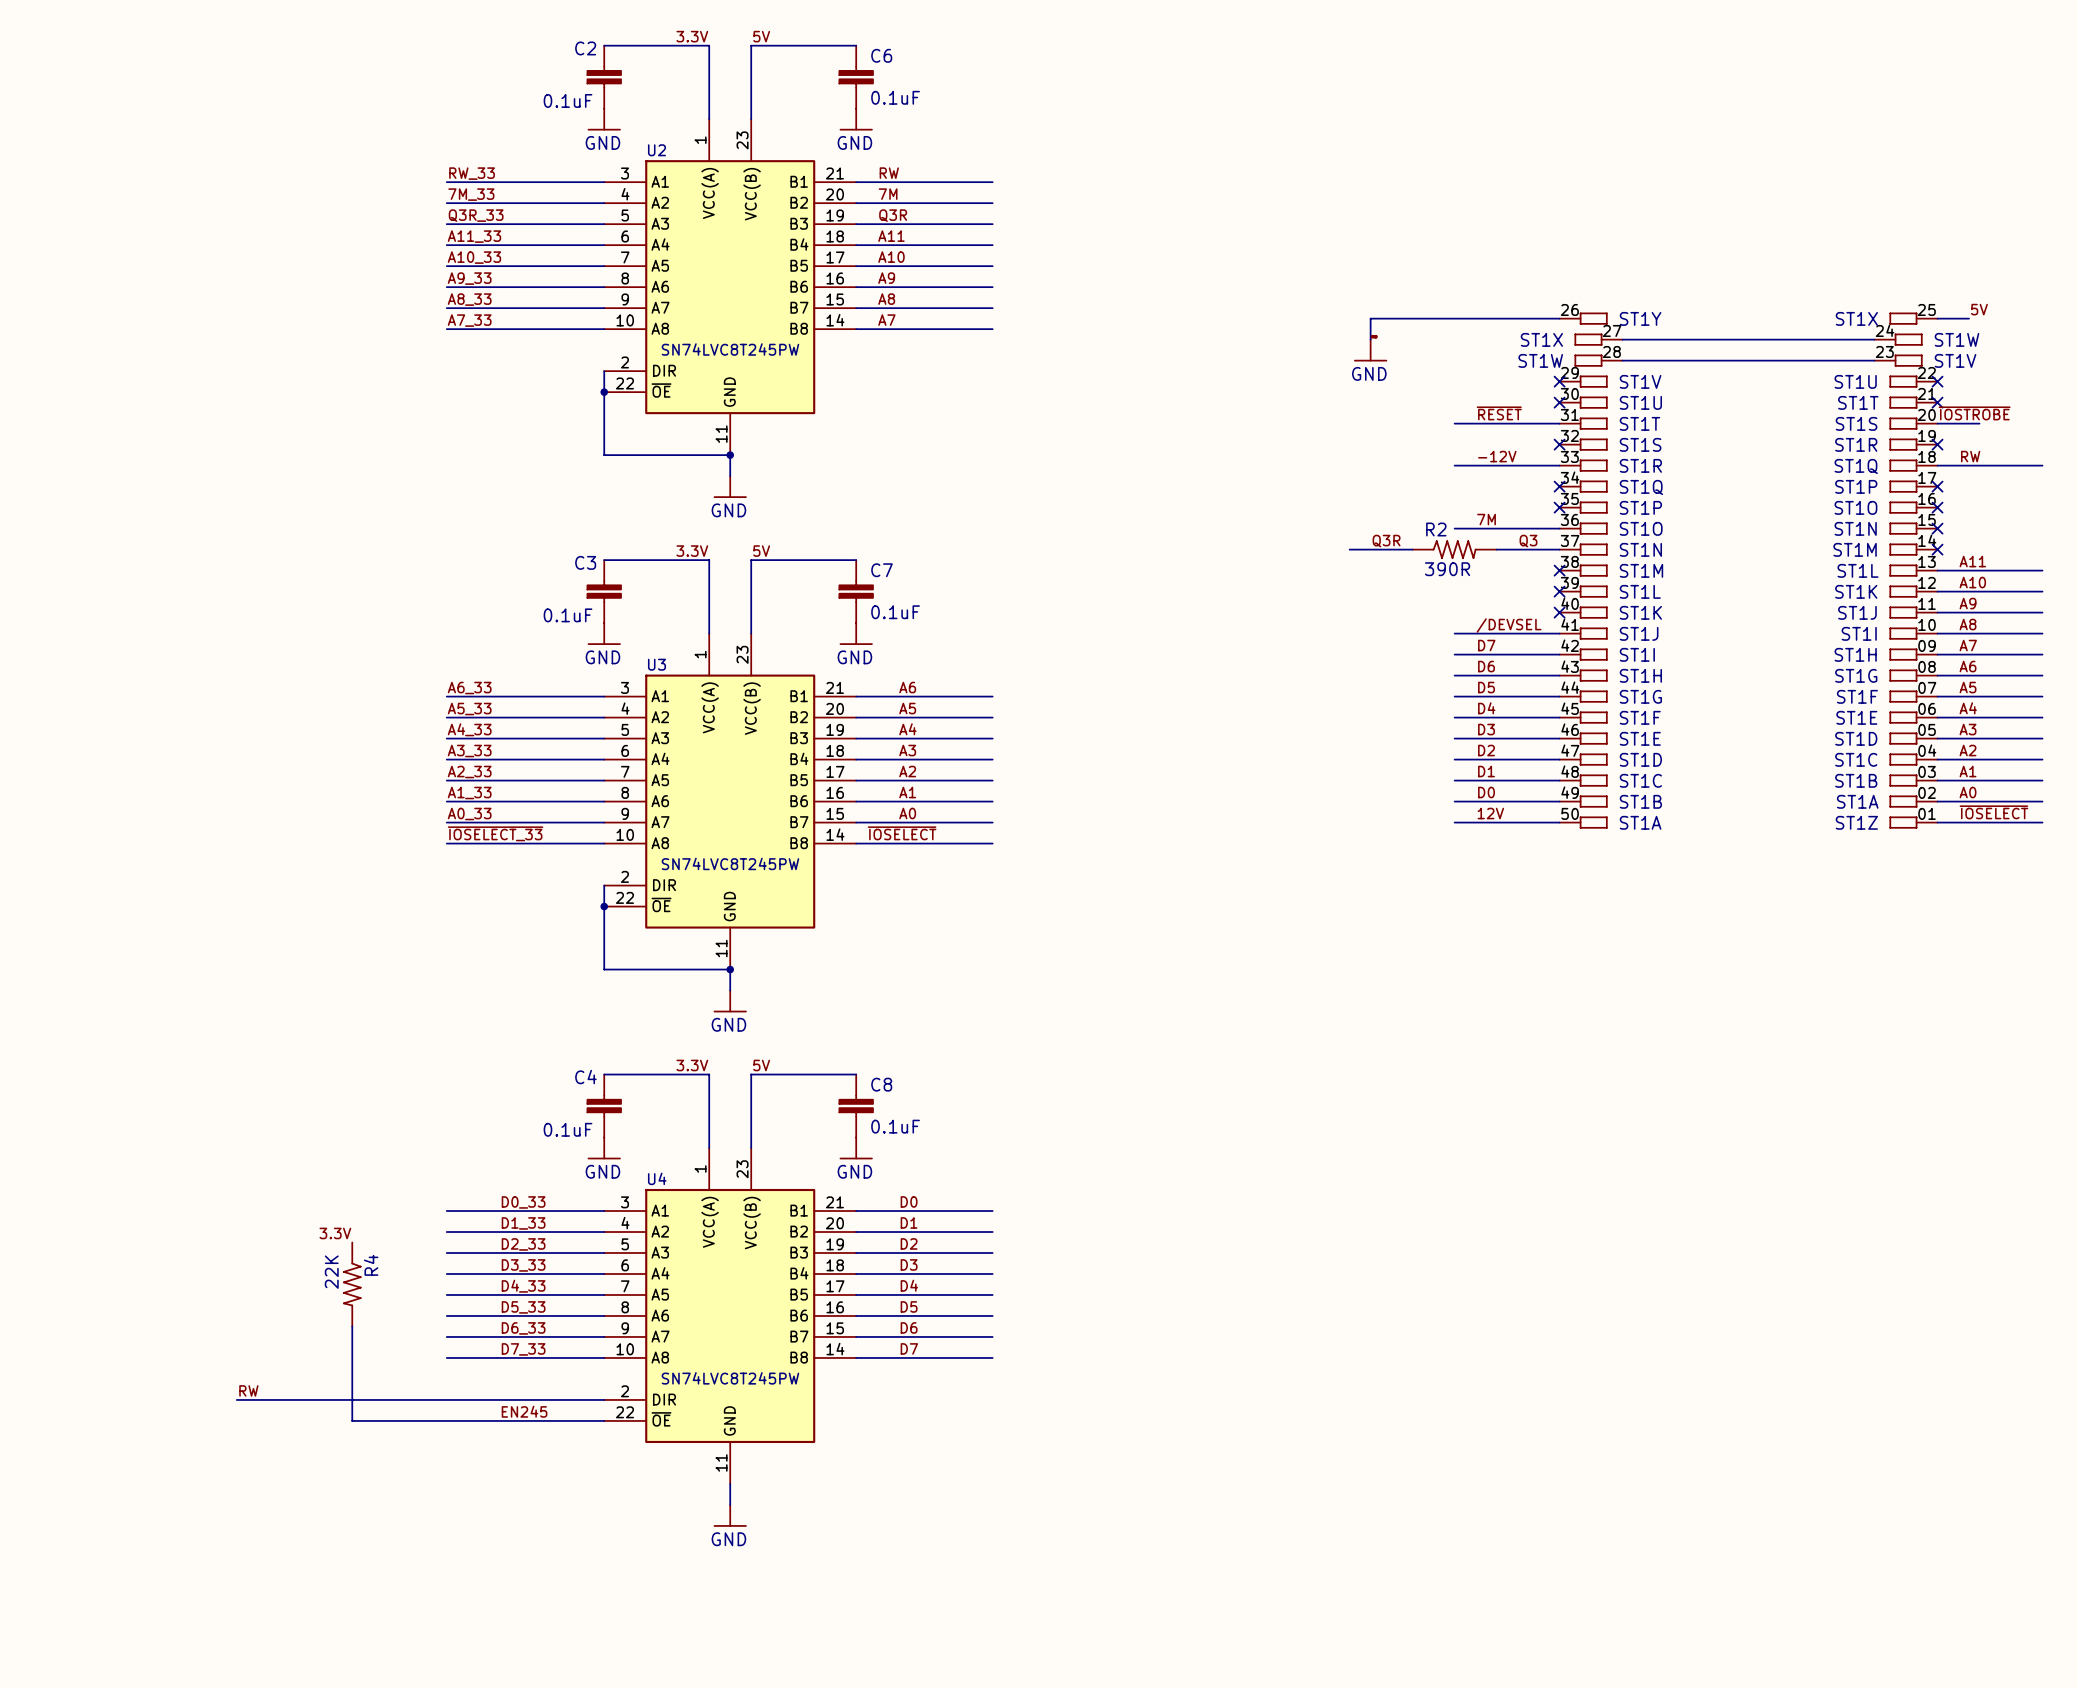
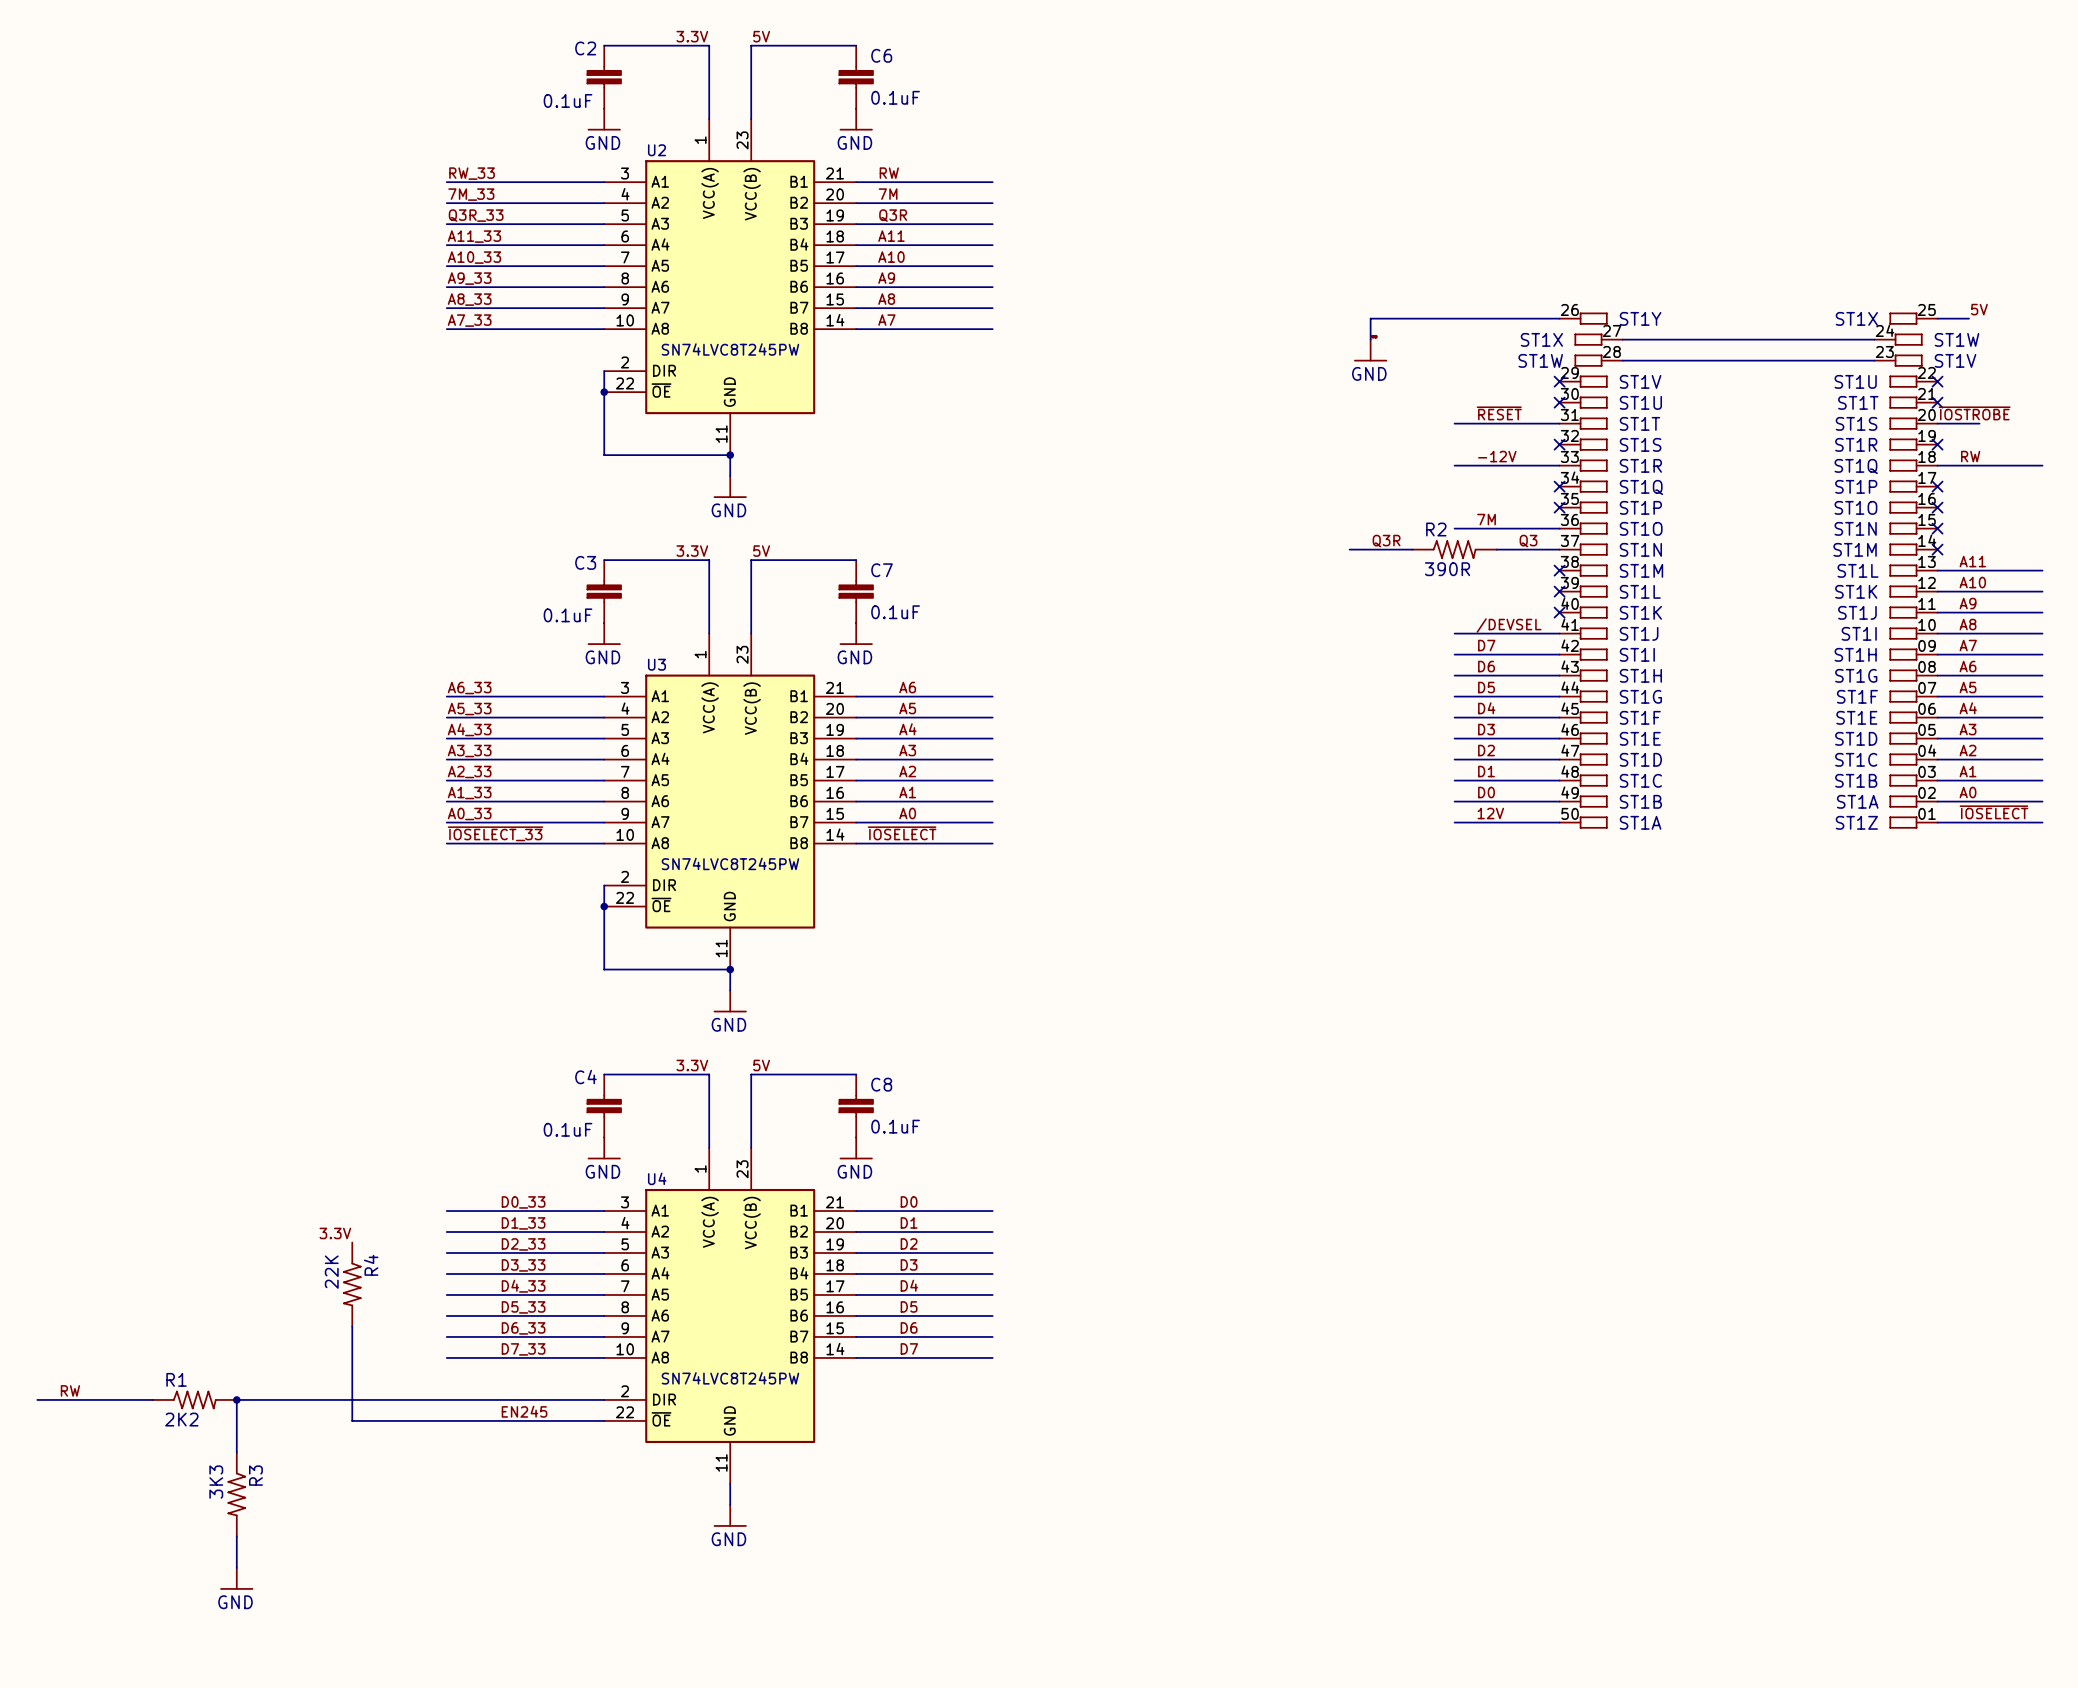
label position: RW (248, 1390) -> RW (70, 1390)
wire: none -> (37, 1399) (152, 1399)
R1: none -> 2K2 (194, 1399)
wire: none -> (236, 1399) (236, 1452)
junction: none -> (236, 1399)
R3: none -> 3K3 (236, 1494)
wire: none -> (236, 1536) (236, 1567)
power symbol: none -> GND (236, 1578)

